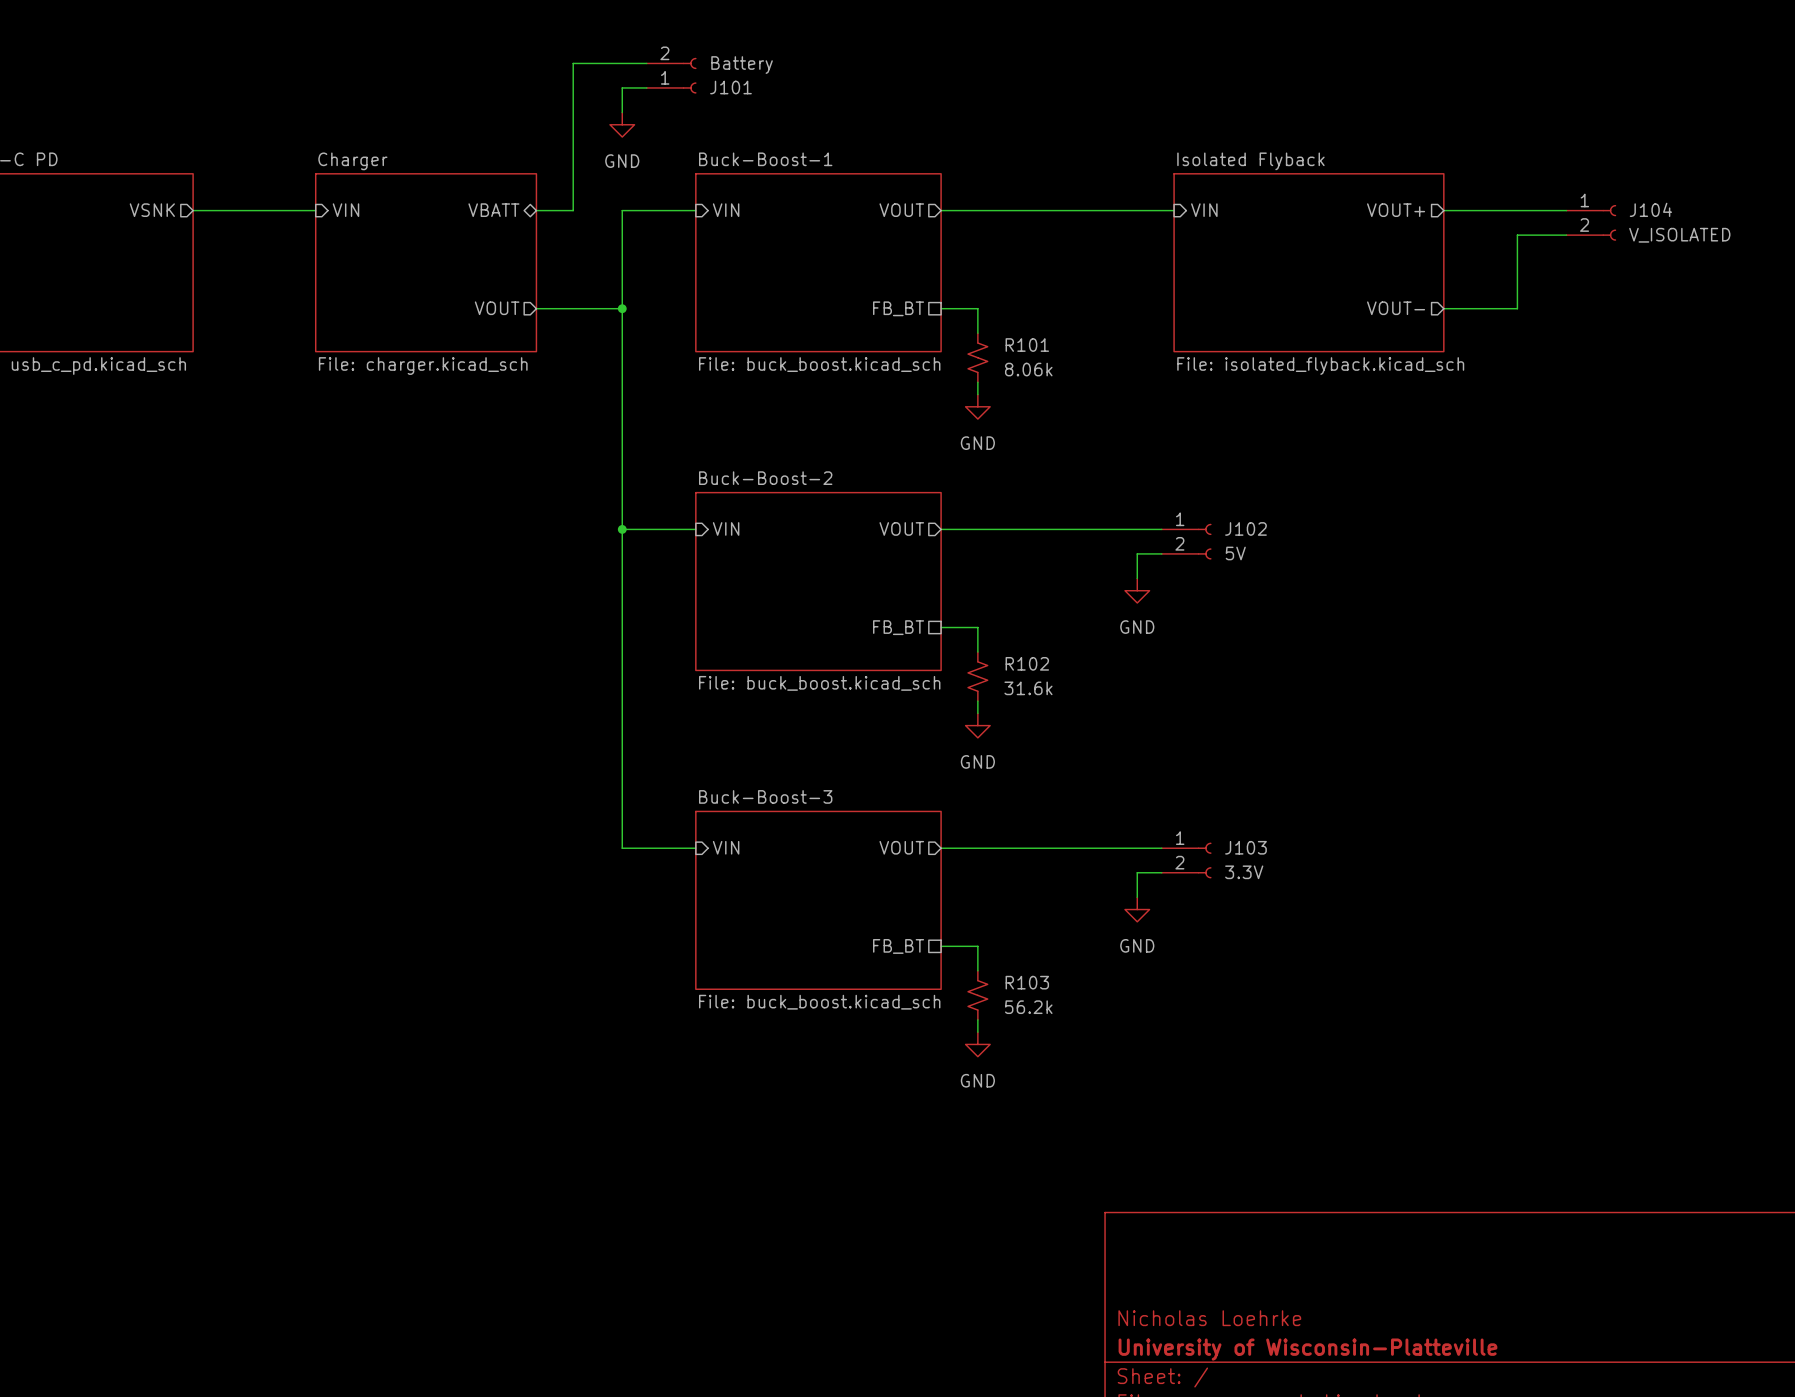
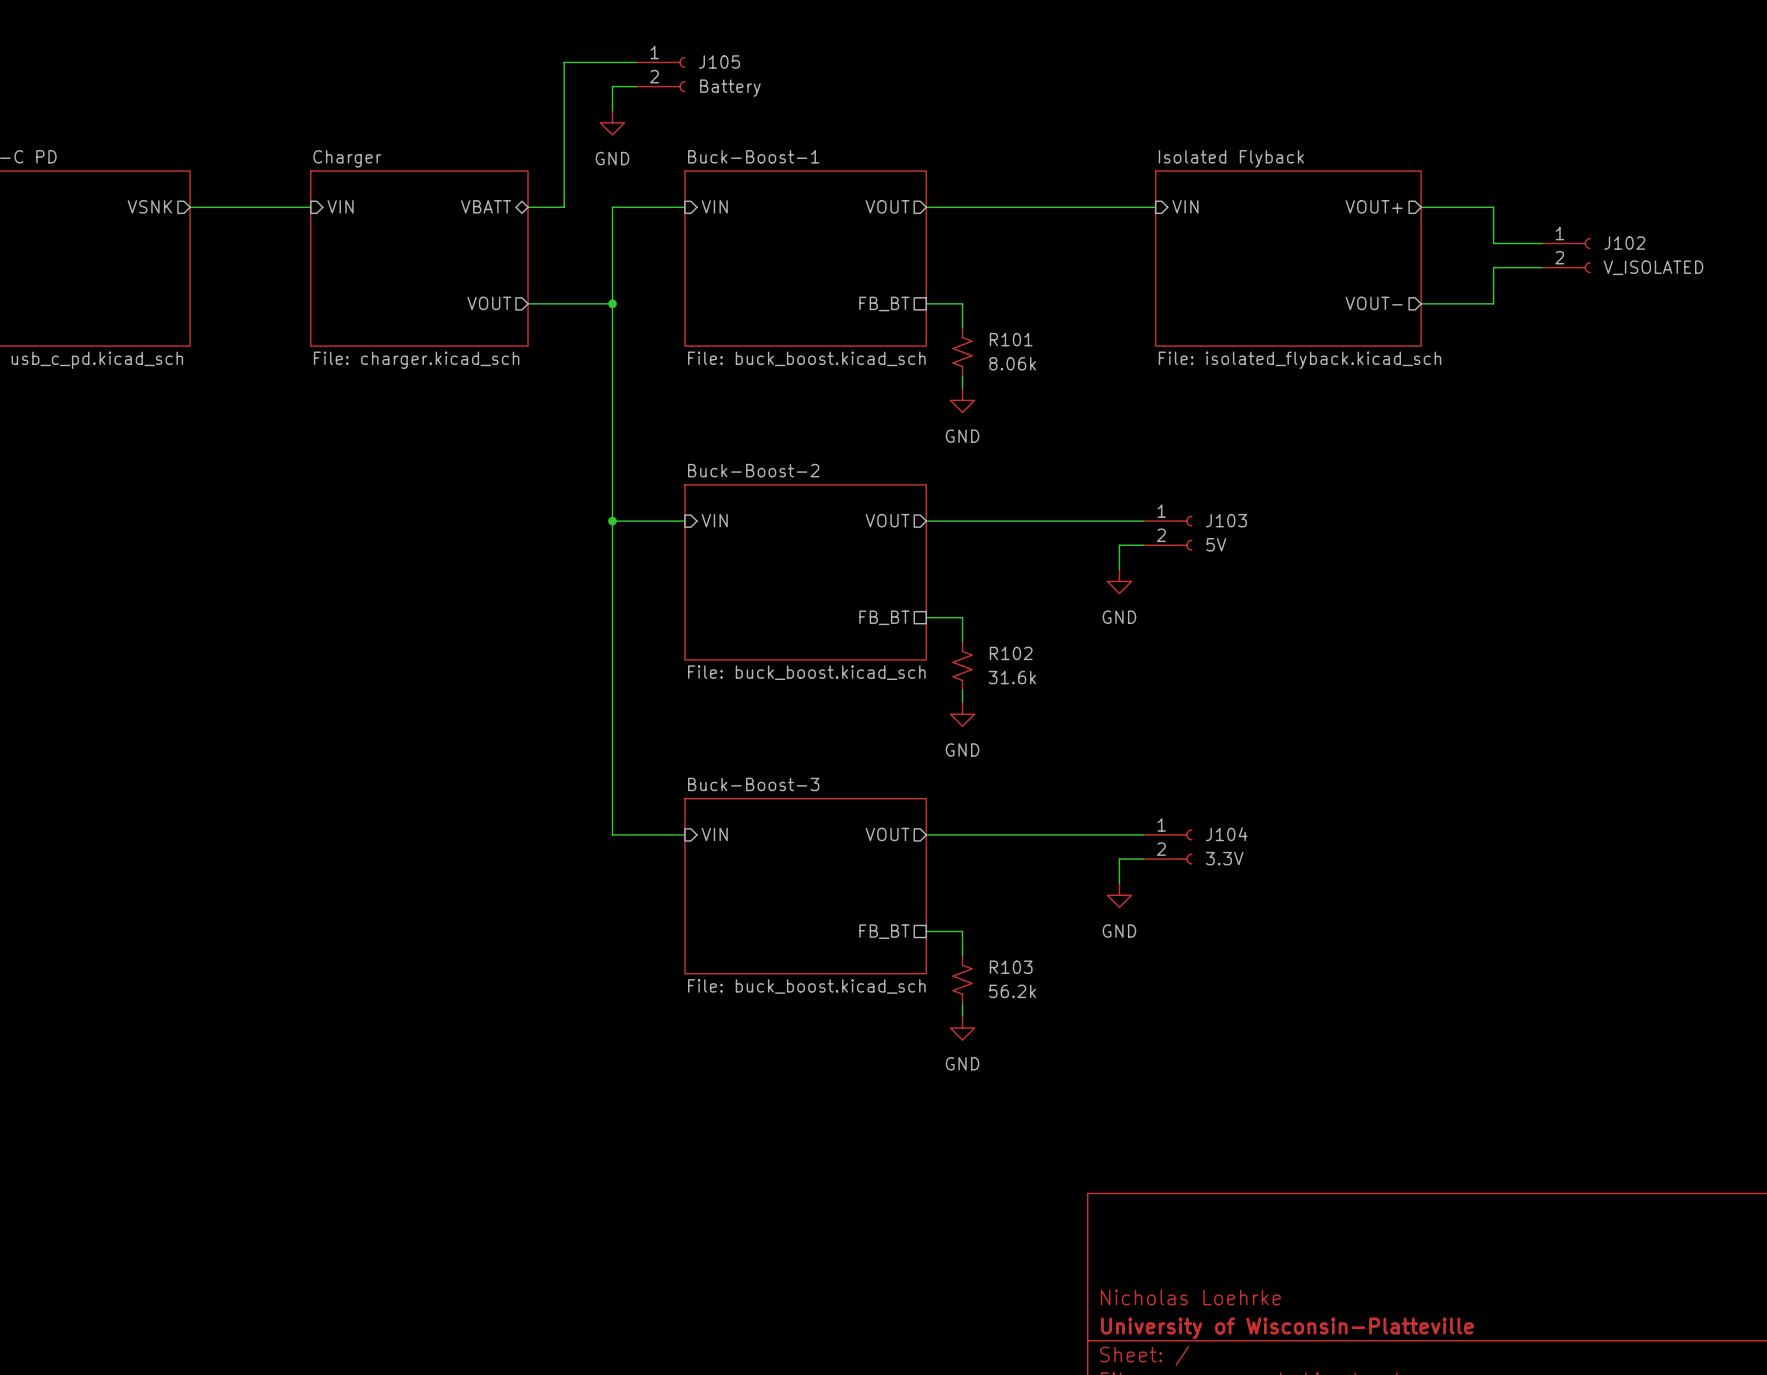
J101 flip: as is (689, 75) -> up-down (678, 74)
J101 name: J101 (730, 87) -> J105 (719, 62)
wire: (1517, 210) (1566, 210) -> (1493, 207) (1493, 231)
J104: V_ISOLATED (1591, 222) -> none
wire: (1517, 235) (1566, 235) -> (1493, 267) (1541, 267)
wire: (1517, 247) (1517, 271) -> (1493, 243) (1541, 243)
J102: none -> V_ISOLATED (1566, 255)
J102 name: J102 (1245, 528) -> J103 (1226, 520)
J103 name: J103 (1245, 847) -> J104 (1226, 834)

